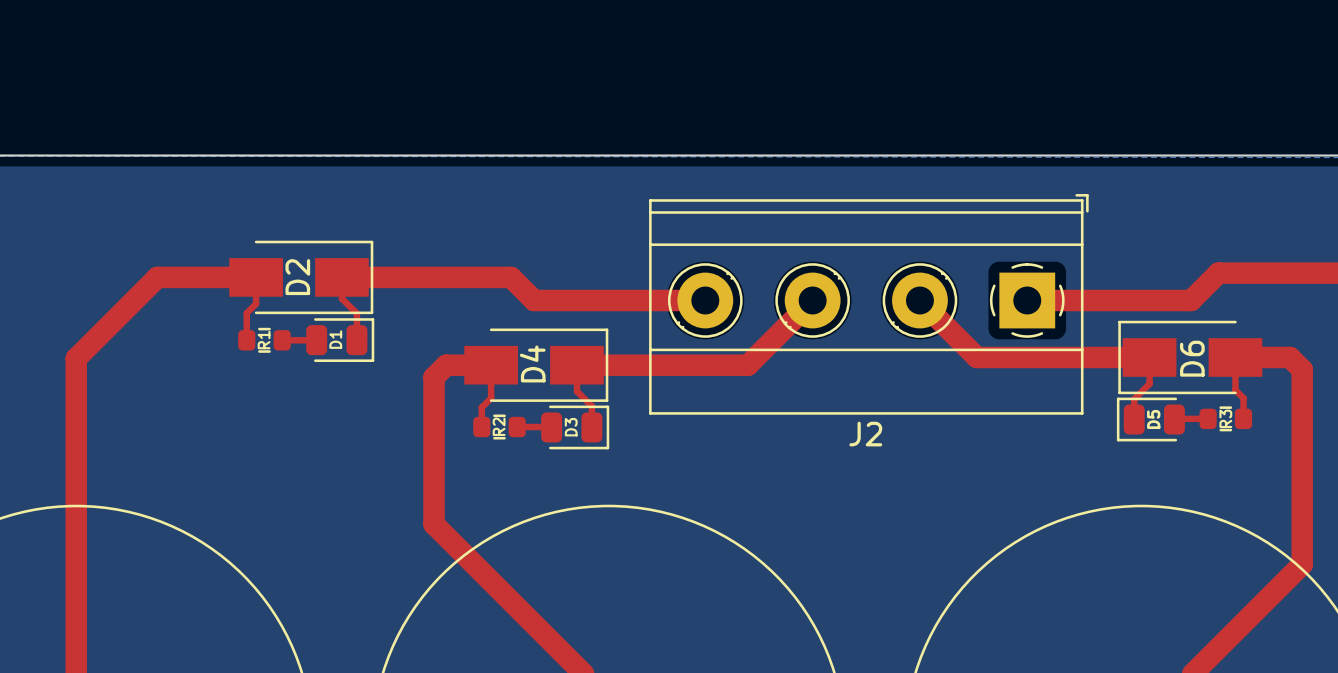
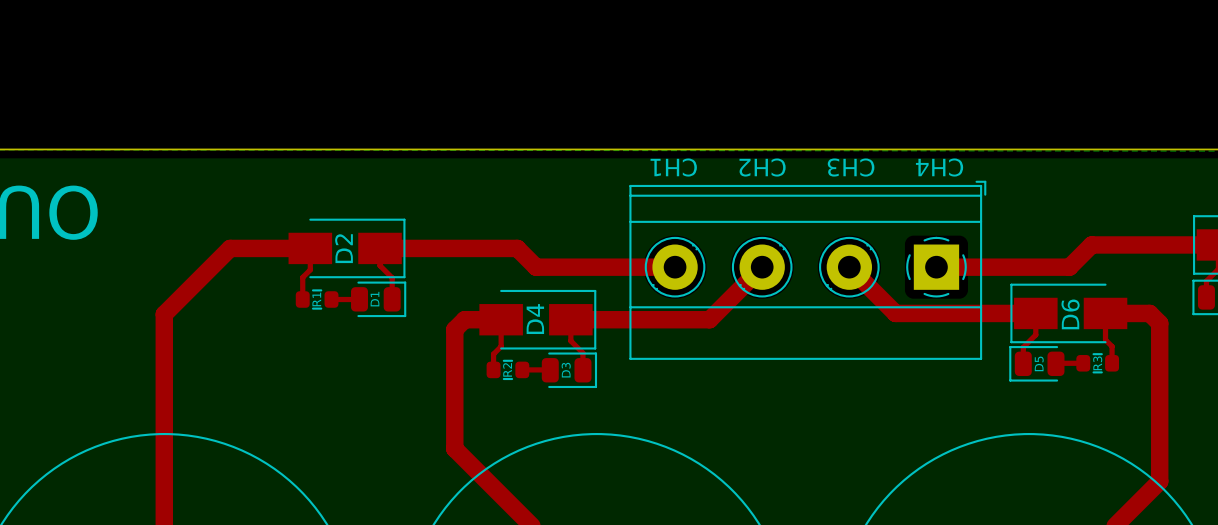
text: none -> CH1 (673, 167)
text: none -> CH2 (762, 167)
text: none -> CH3 (851, 167)
text: none -> CH4 (939, 167)
J2 name: J2 (865, 434) -> none

